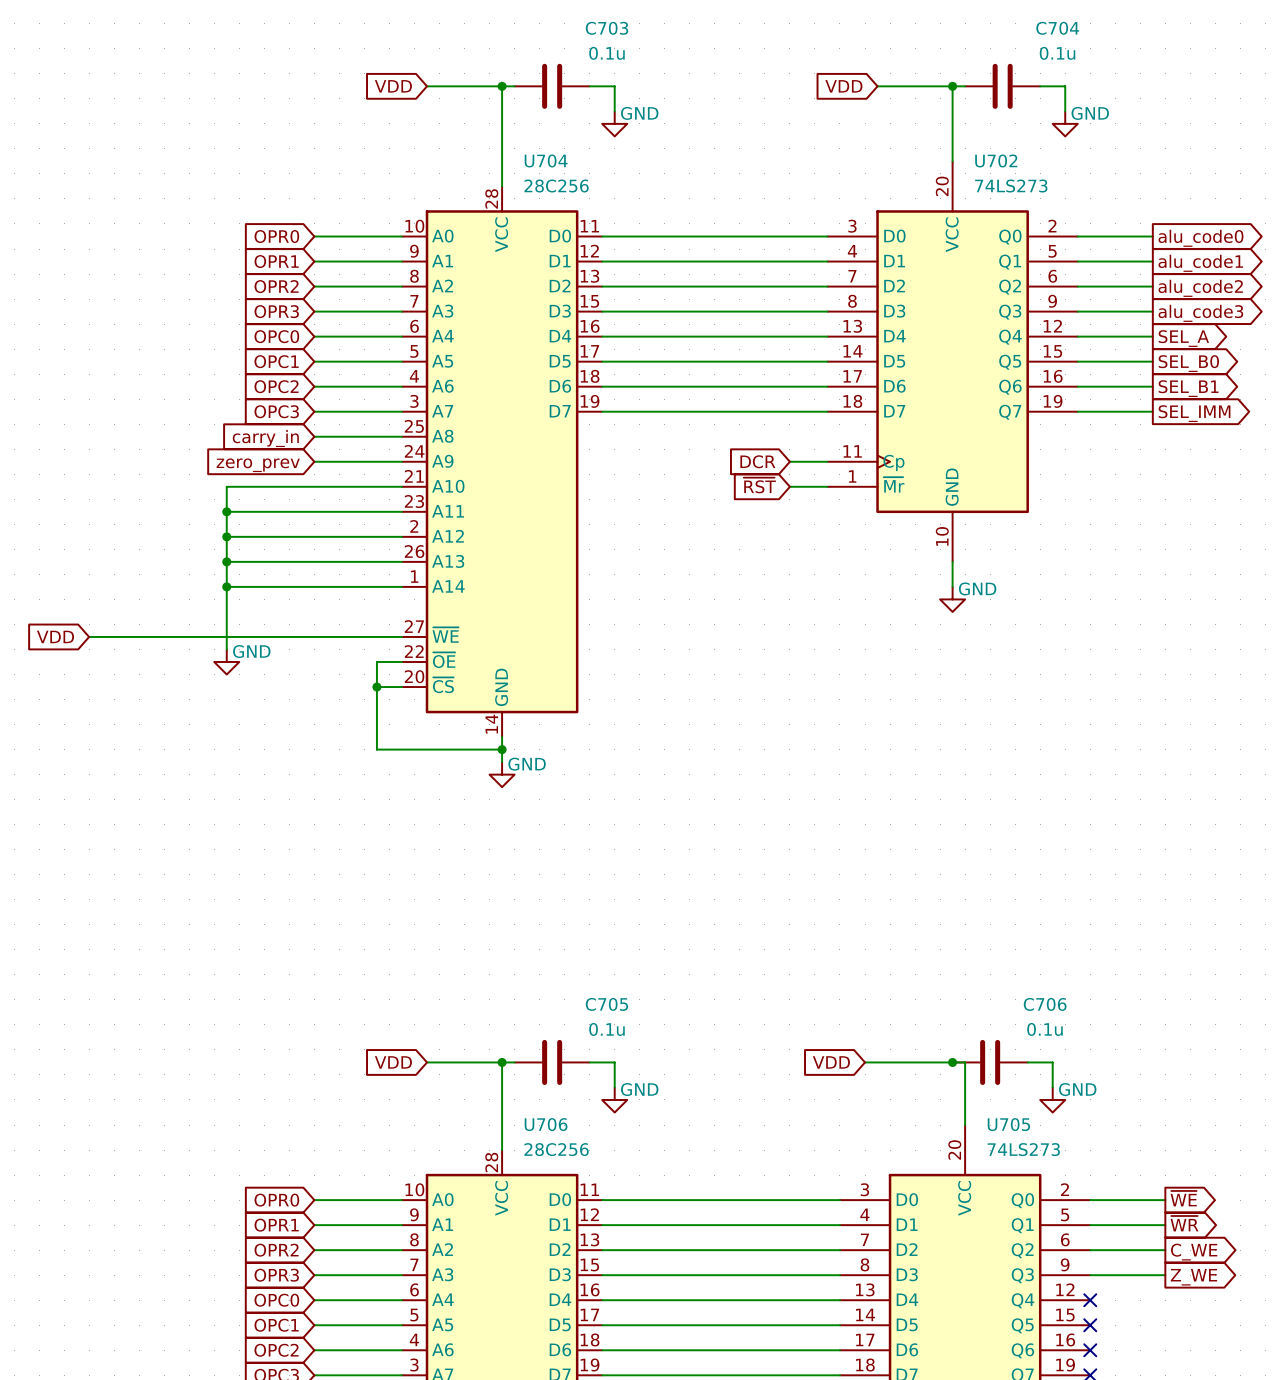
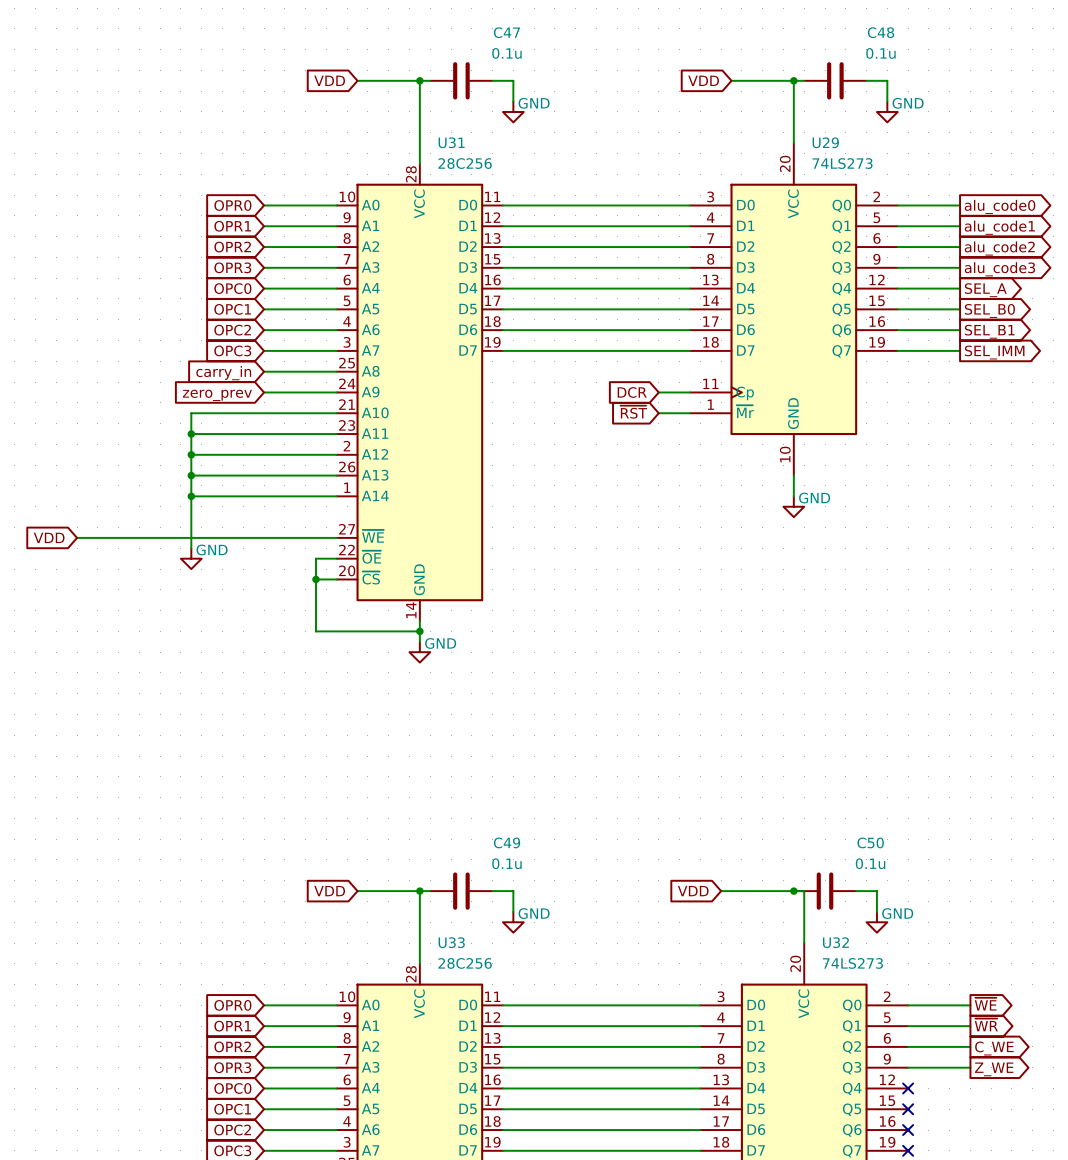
C703 name: C703 (607, 28) -> C47 (506, 32)
C704 name: C704 (1057, 28) -> C48 (881, 32)
U704 name: U704 (546, 160) -> U31 (451, 142)
U702 name: U702 (996, 160) -> U29 (825, 142)
C705 name: C705 (606, 1004) -> C49 (507, 842)
C706 name: C706 (1045, 1004) -> C50 (870, 842)
U706 name: U706 (546, 1124) -> U33 (451, 942)
U705 name: U705 (1008, 1124) -> U32 (835, 942)

